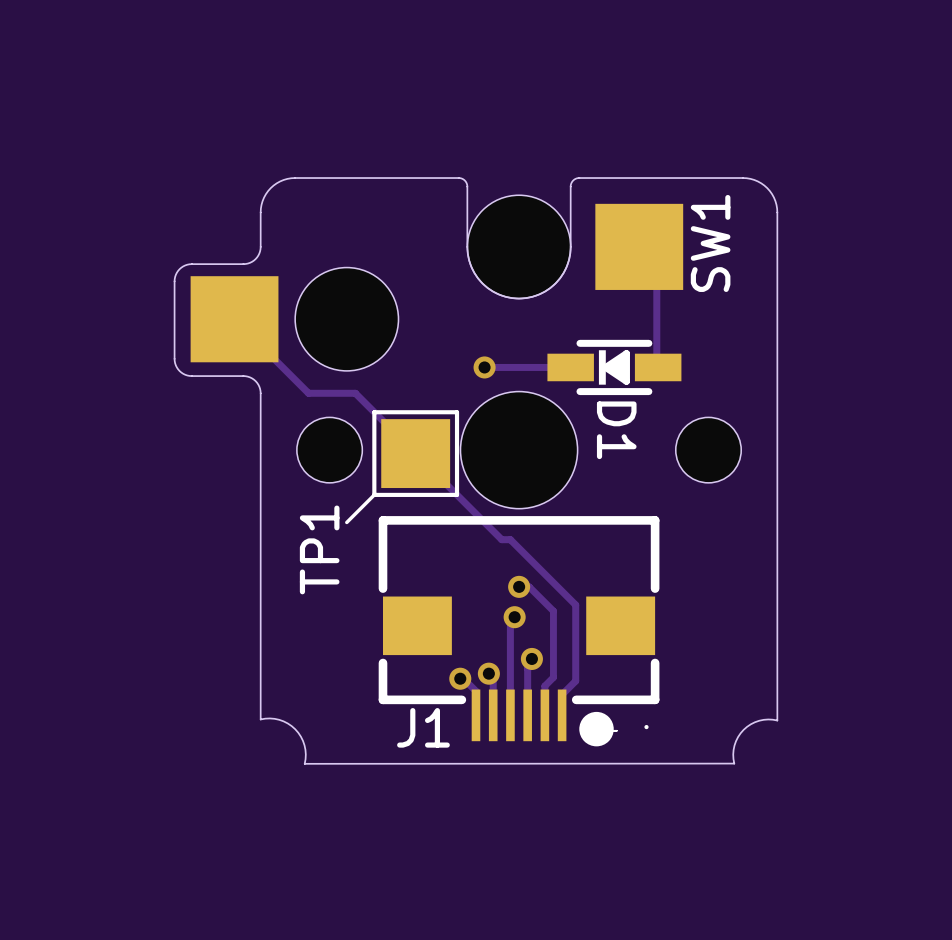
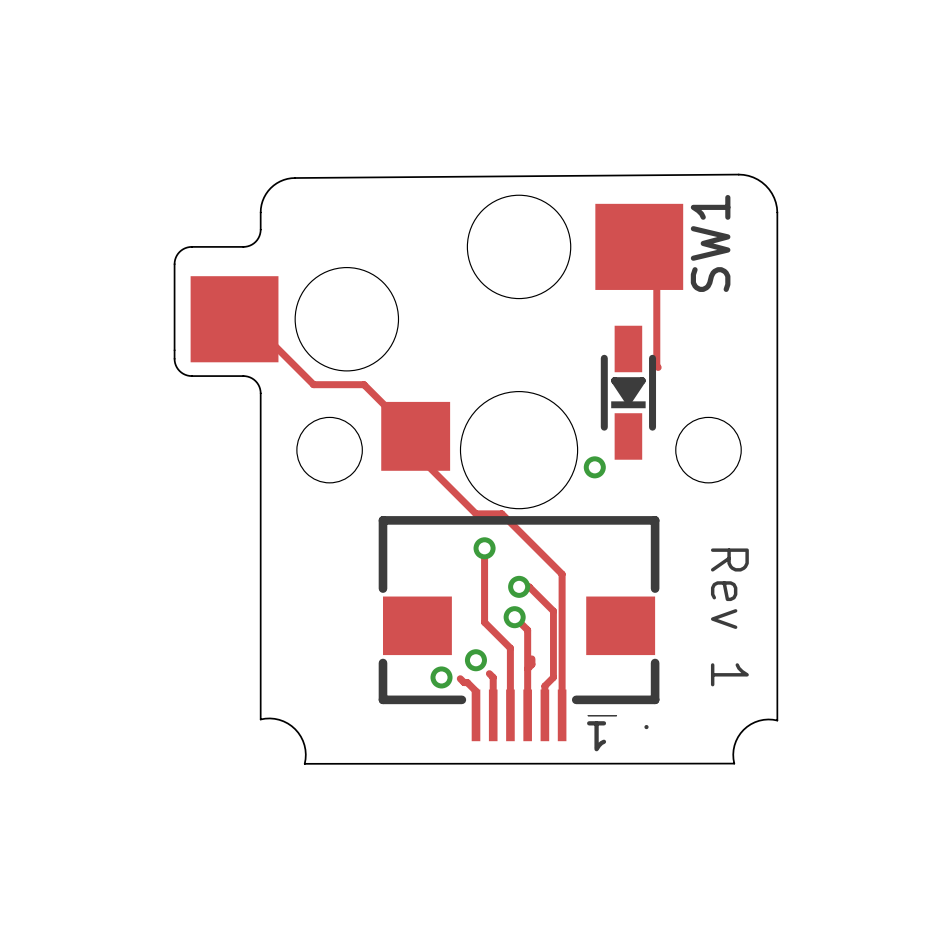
board edge: (295, 178) (463, 179) (467, 185) (467, 246) (471, 266) (478, 278) (487, 287) (499, 294) (512, 298) (525, 298) (538, 294) (550, 287) (563, 272) (570, 253) (570, 185) (576, 178) (746, 178) (757, 181) (769, 190) (775, 201) (777, 212) -> (295, 178) (743, 174) (757, 179) (769, 189) (775, 202) (777, 212)
board edge: (260, 229) (260, 251) (252, 261) (243, 264) (187, 264) (178, 270) (174, 281) -> (260, 229) (257, 240) (247, 246) (191, 246) (183, 249) (175, 259) (174, 281)
track: (234, 305) (220, 305) (308, 393) (355, 393) (407, 444) -> (234, 305) (313, 384) (364, 384) (407, 427) (407, 444)
track: (484, 367) (570, 367) -> none
via: (484, 367) -> none
D1: (614, 367) -> none
part: none -> (628, 392)
part: none -> (415, 436)
TP1: (415, 453) -> none
via: none -> (594, 467)
line: (374, 494) (346, 522) -> none
track: (475, 513) (501, 539) (510, 539) (575, 605) (575, 681) (562, 694) -> (475, 513) (501, 513) (562, 574) (562, 694)
track: none -> (484, 548) (484, 622) (510, 648)
via: none -> (484, 548)
track: (514, 617) (510, 621) (510, 648) -> (514, 617) (527, 630) (527, 668)
text: none -> Rev 1 (729, 617)
J1: (519, 628) -> none
part: none -> (519, 628)
via: (531, 658) -> none
via: none -> (475, 660)
via: (488, 673) -> none
via: none -> (441, 677)
via: (460, 678) -> none
drawing: [579, 711, 614, 747] -> none

